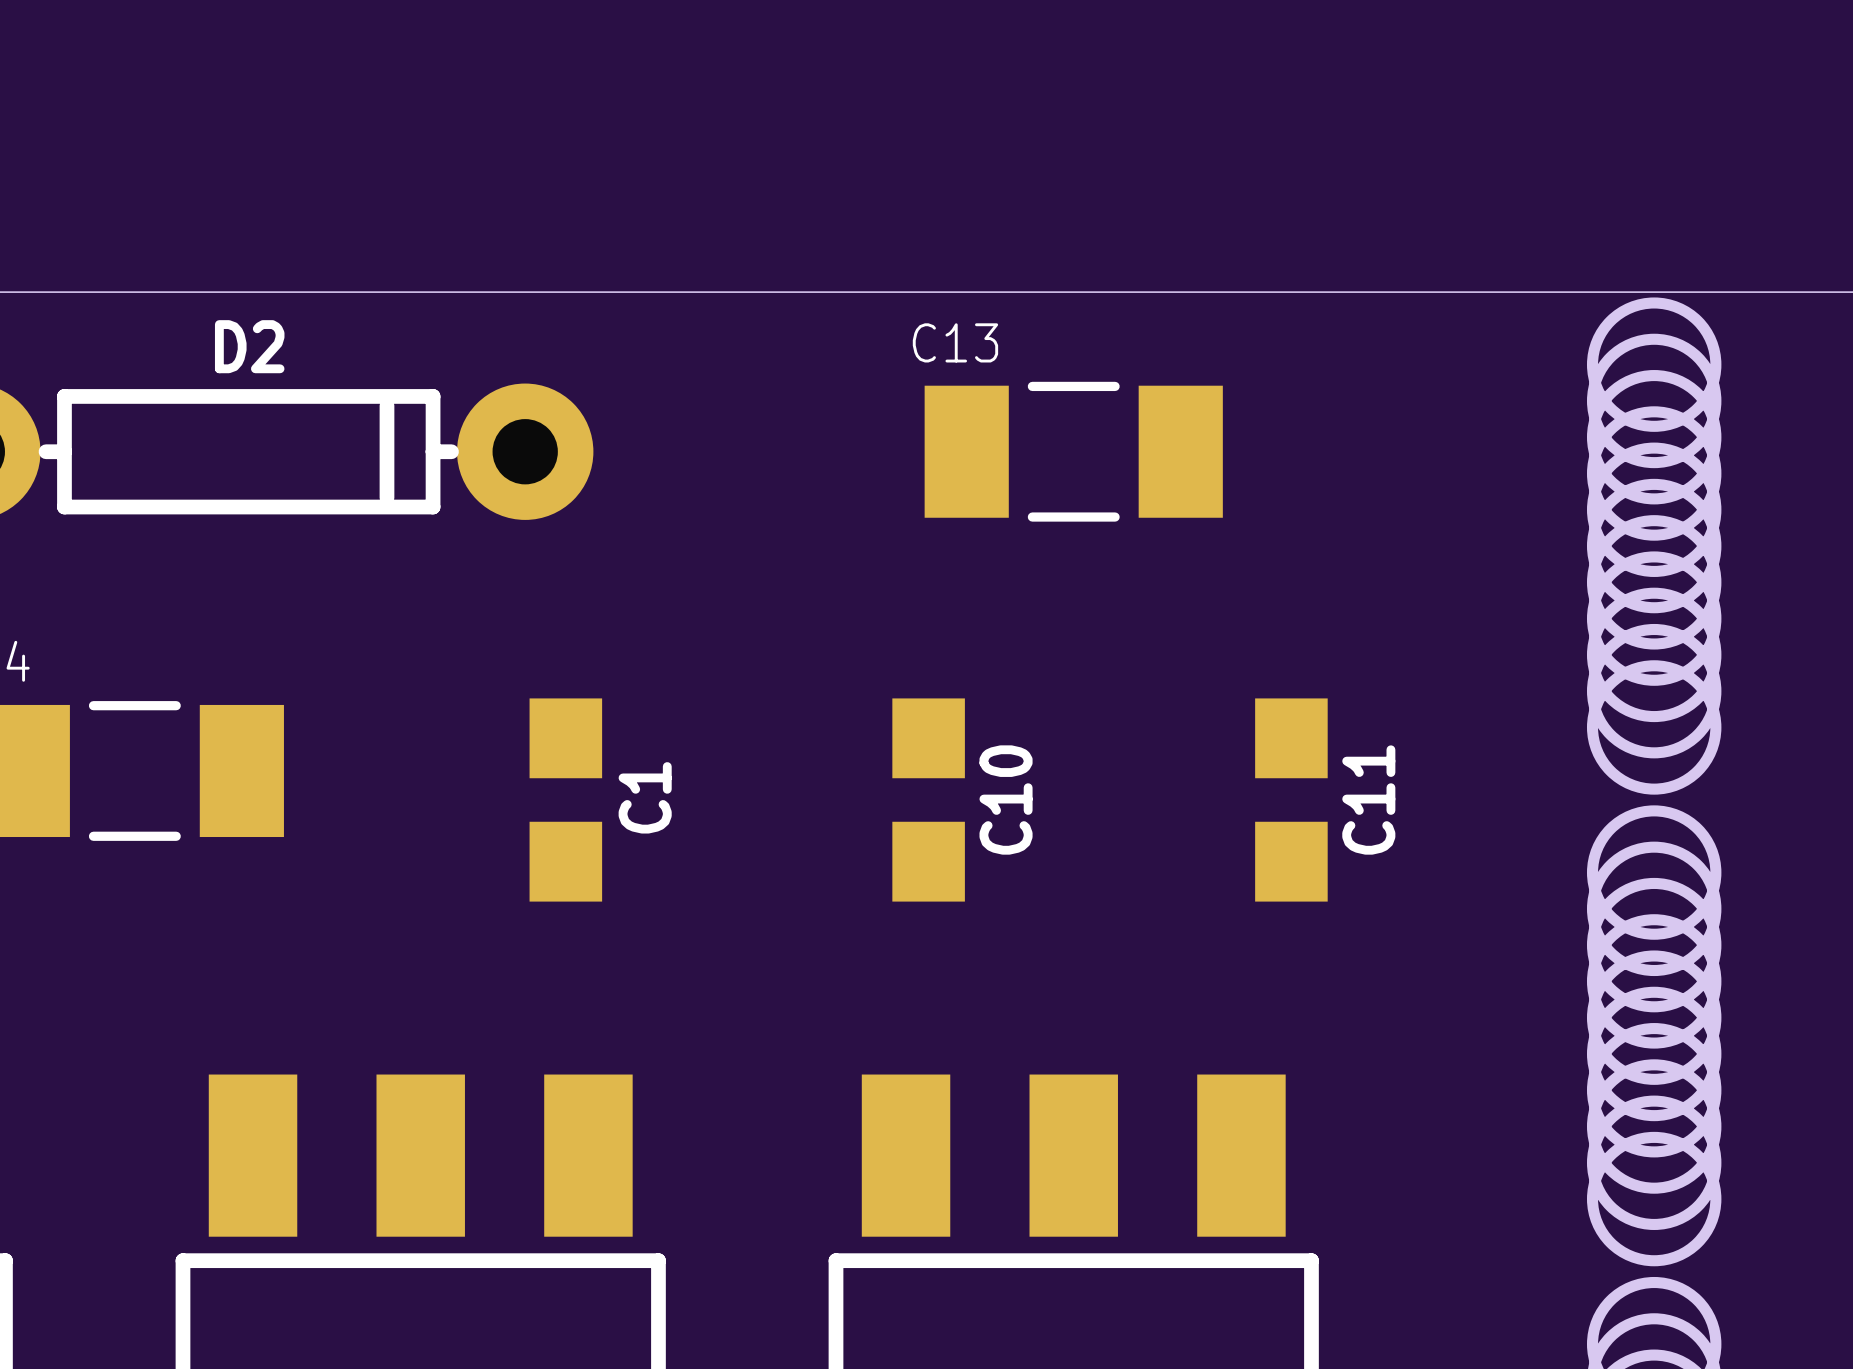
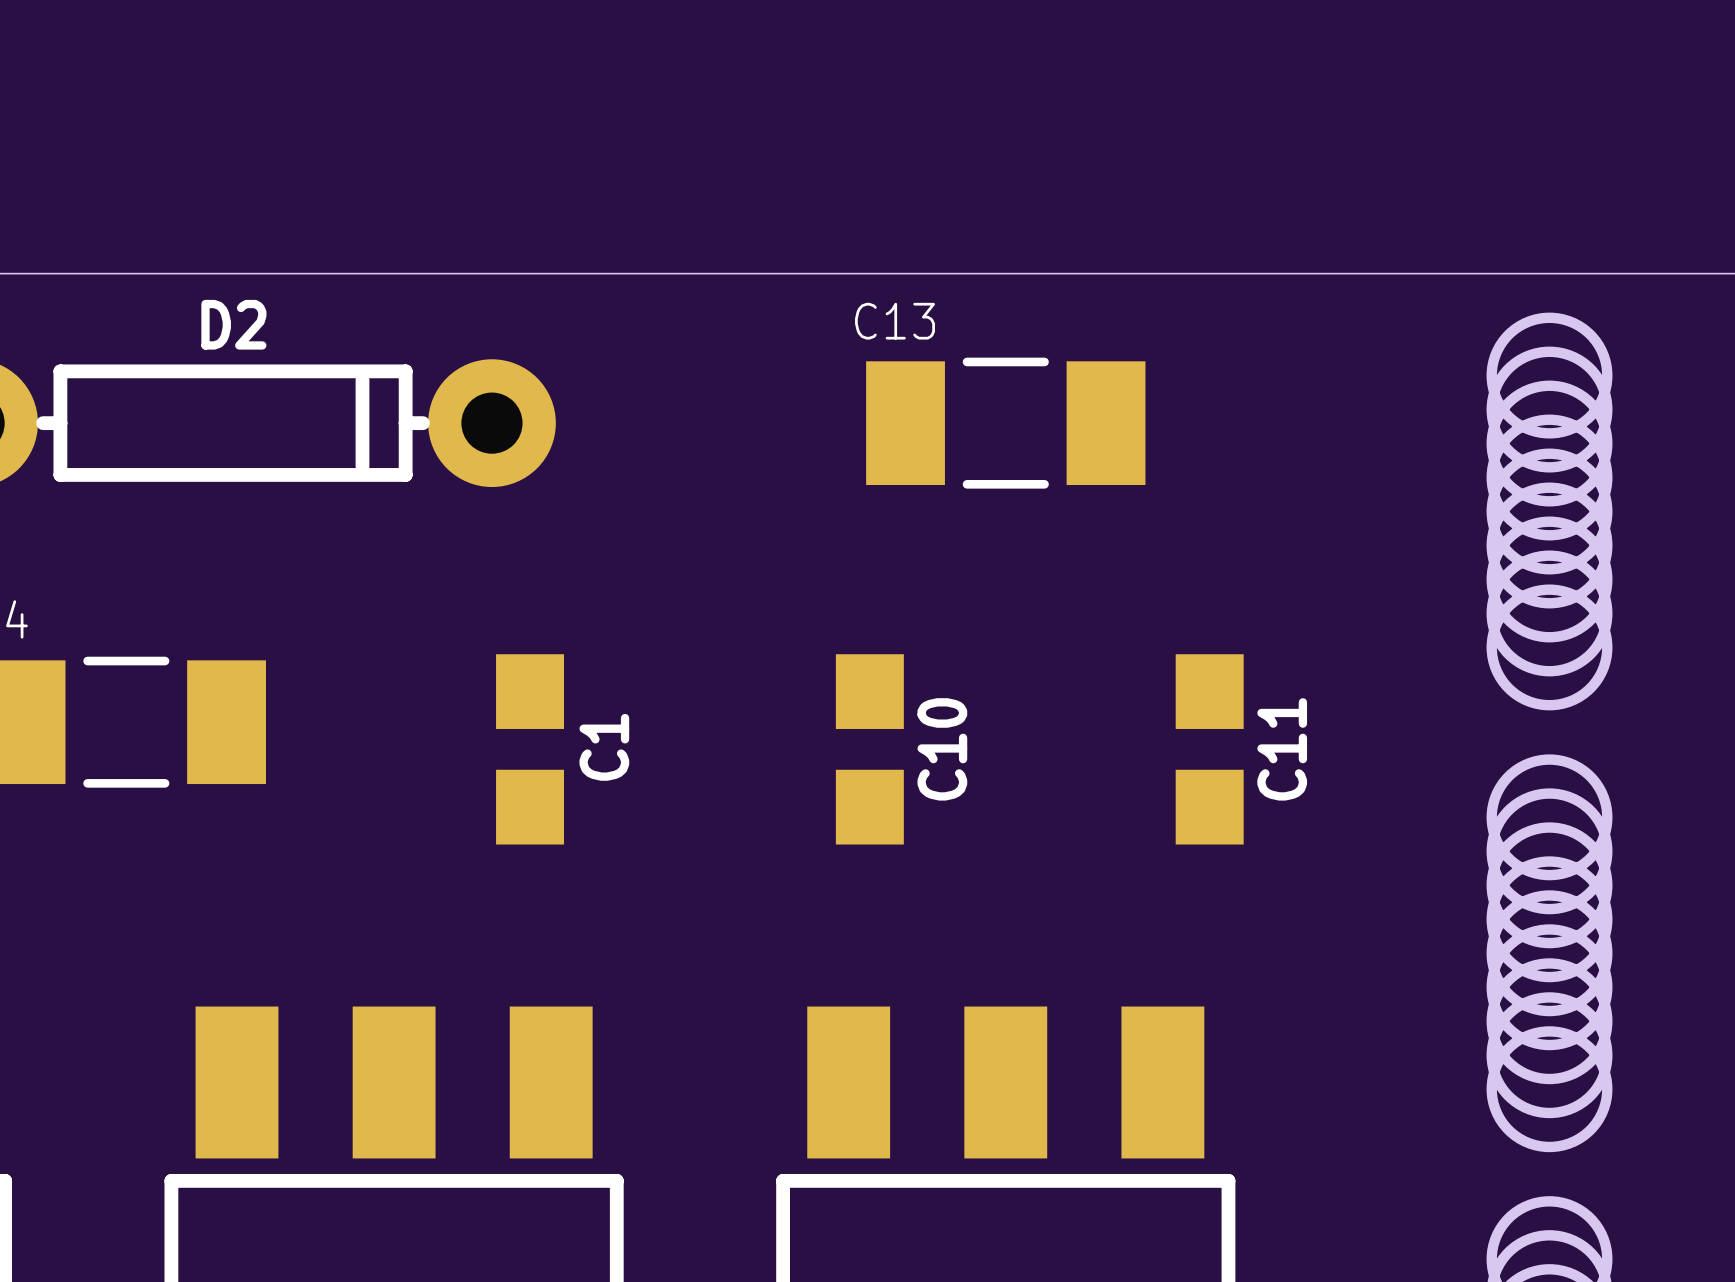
round board edge: [1586, 297, 1722, 432] -> none
round board edge: [1586, 660, 1722, 795] -> none
round board edge: [1586, 1131, 1722, 1267] -> none

